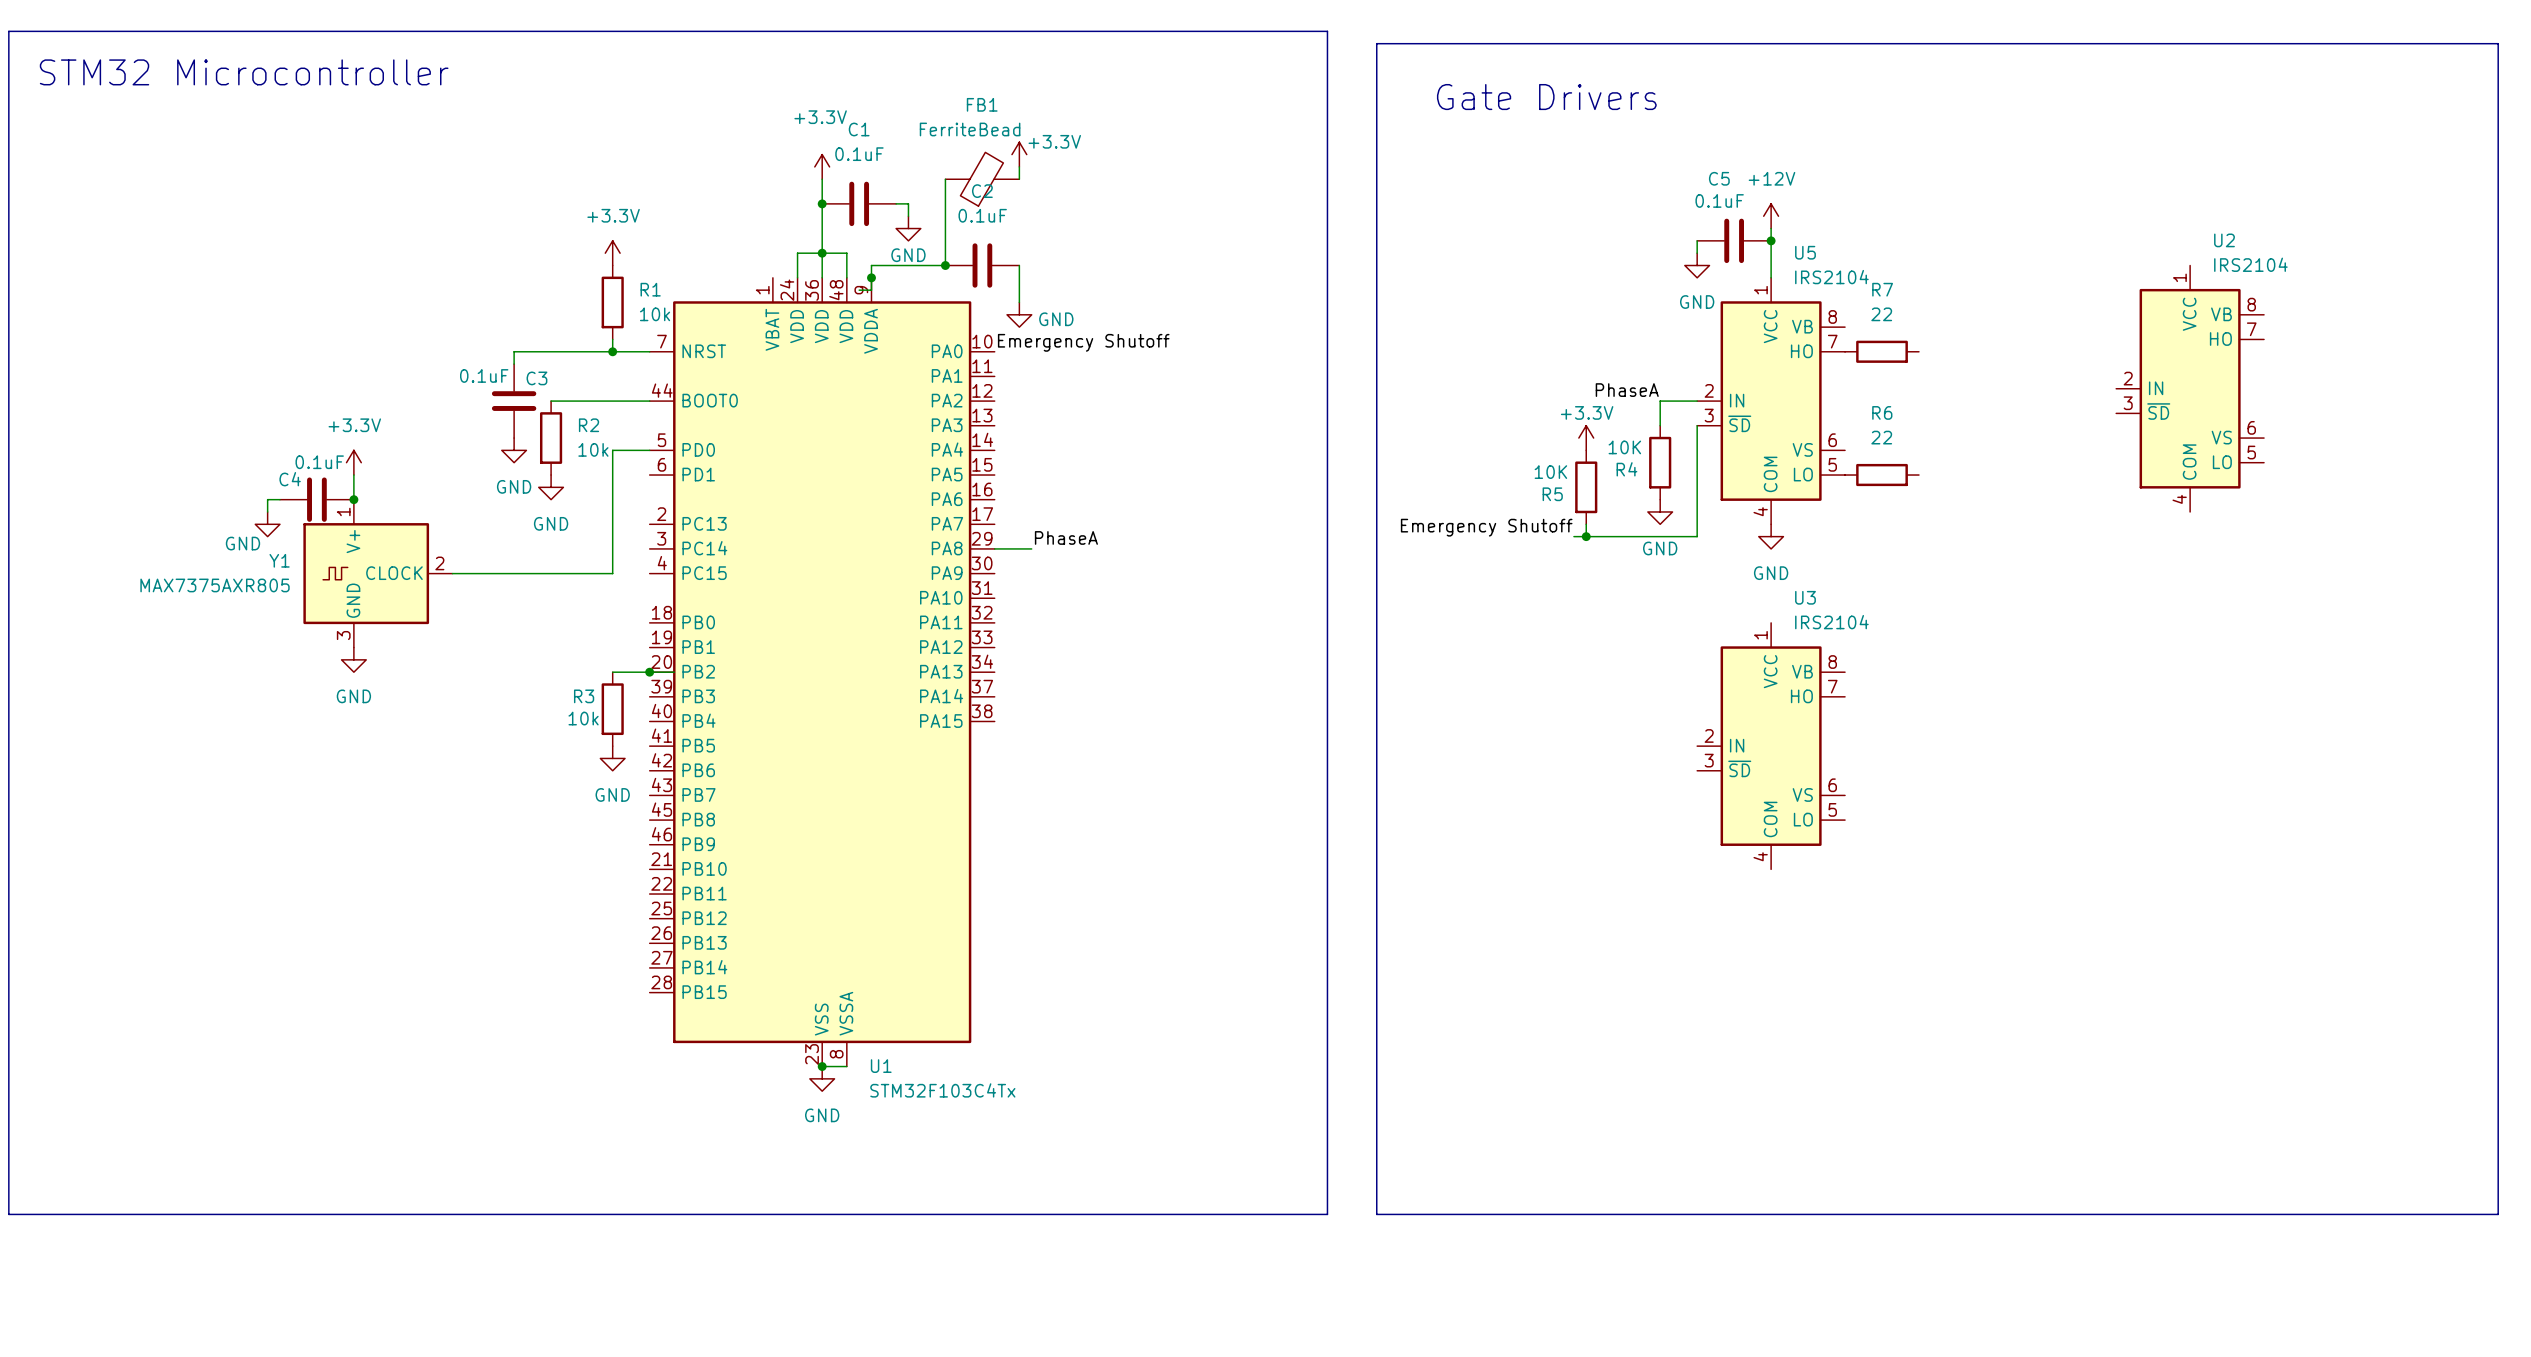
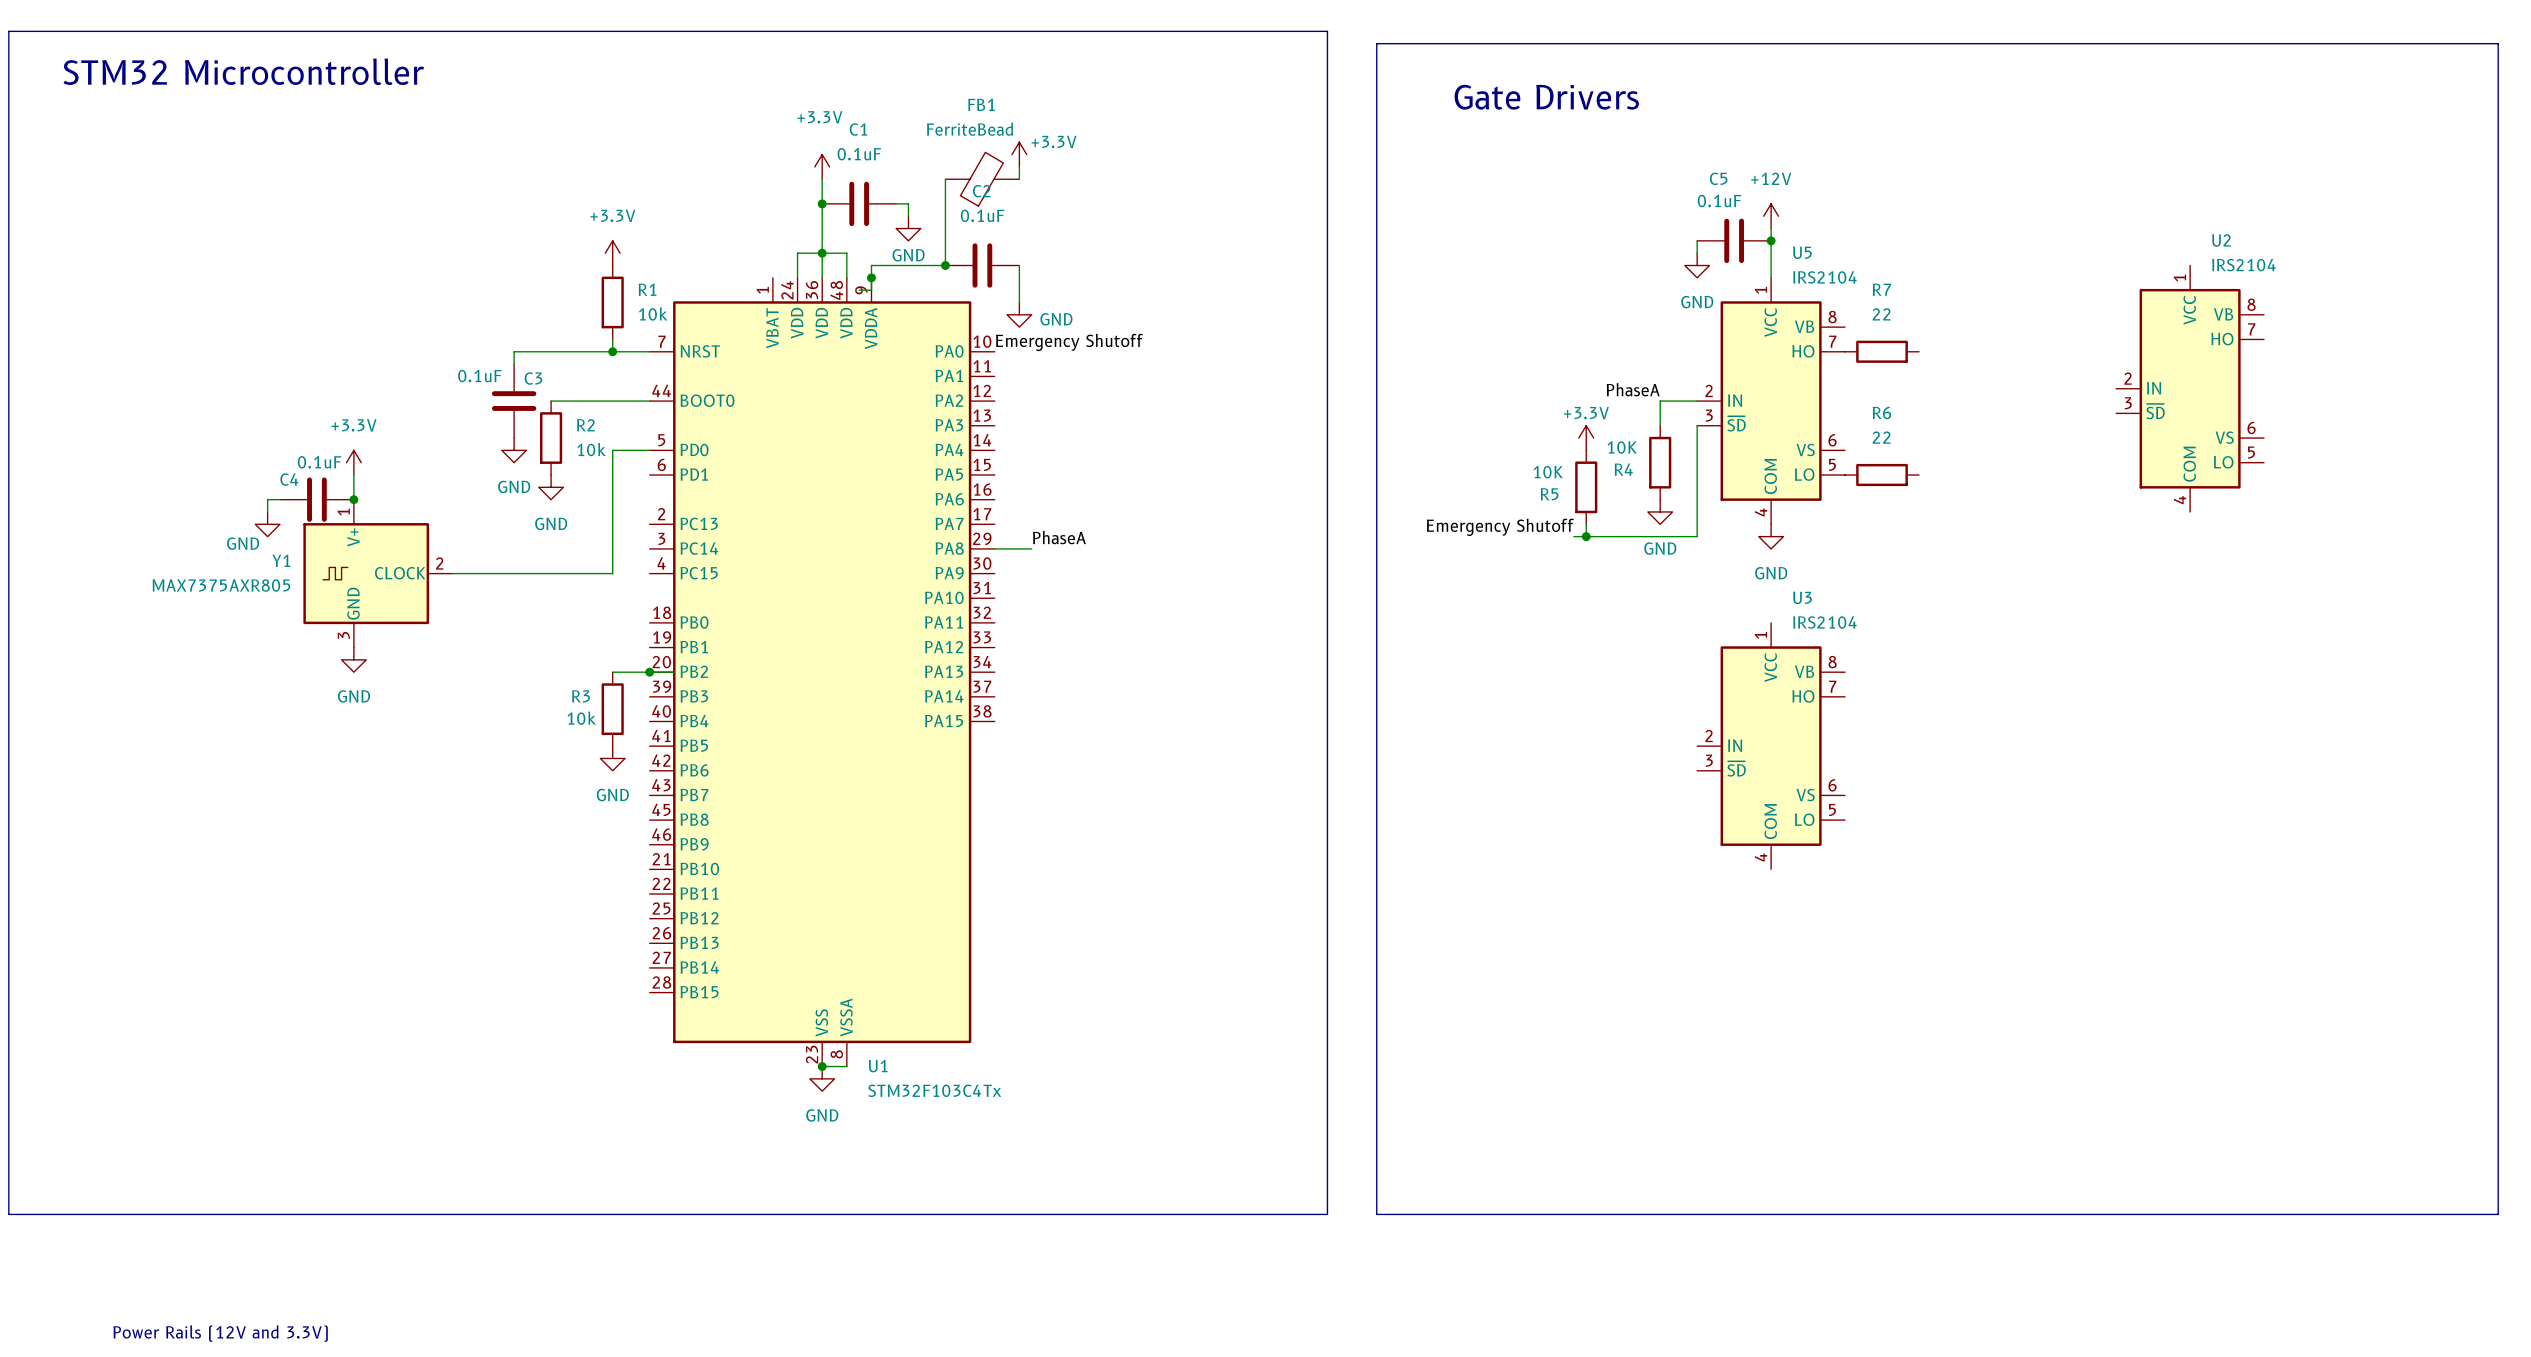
text: none -> Power Rails (12V and 3.3V) (220, 1333)

